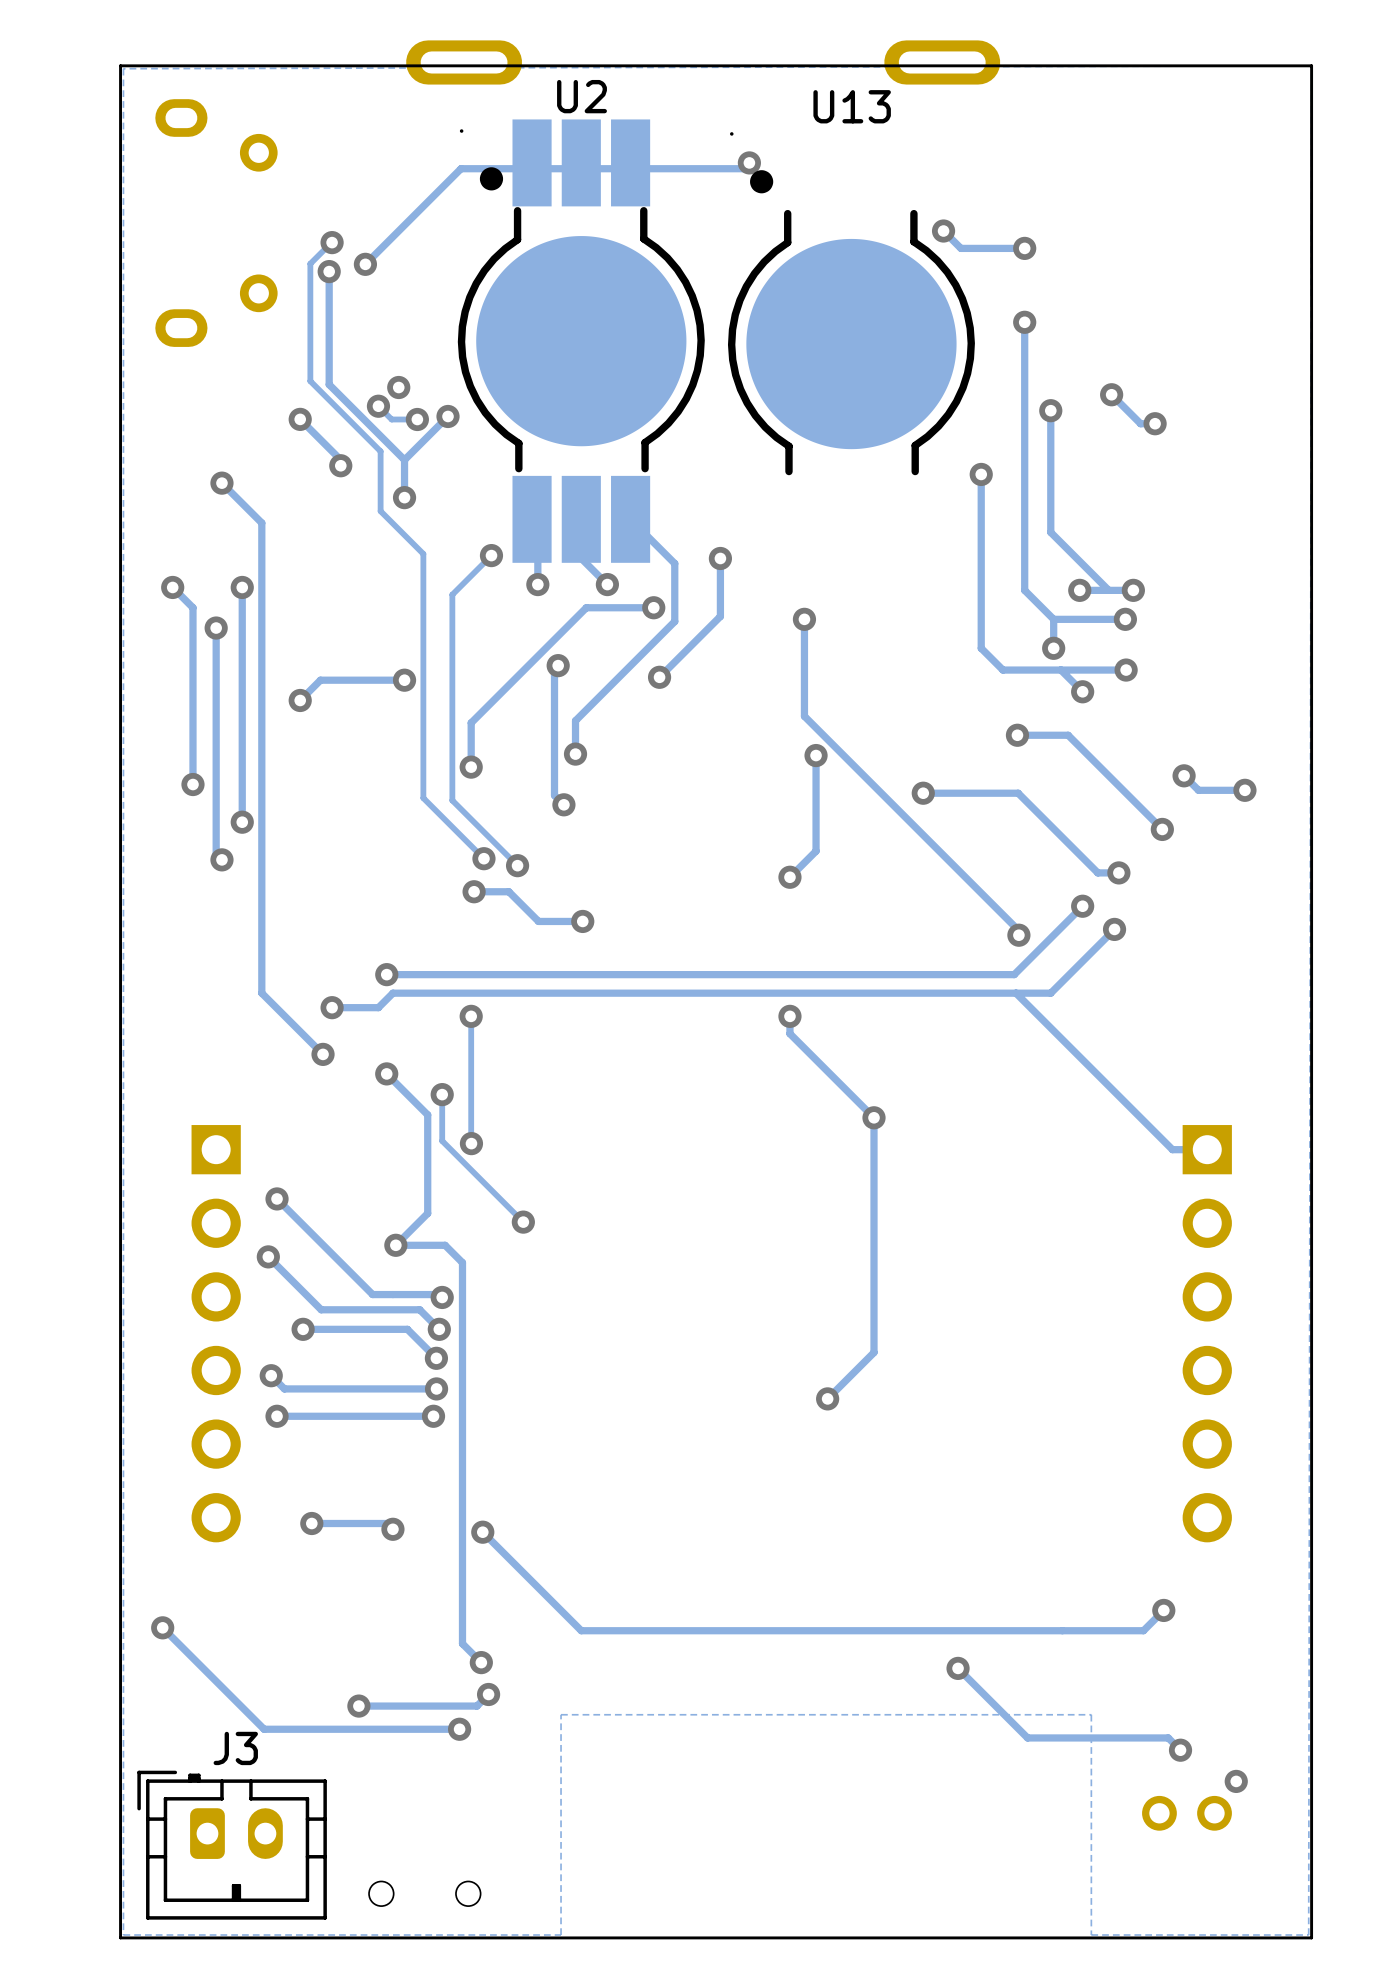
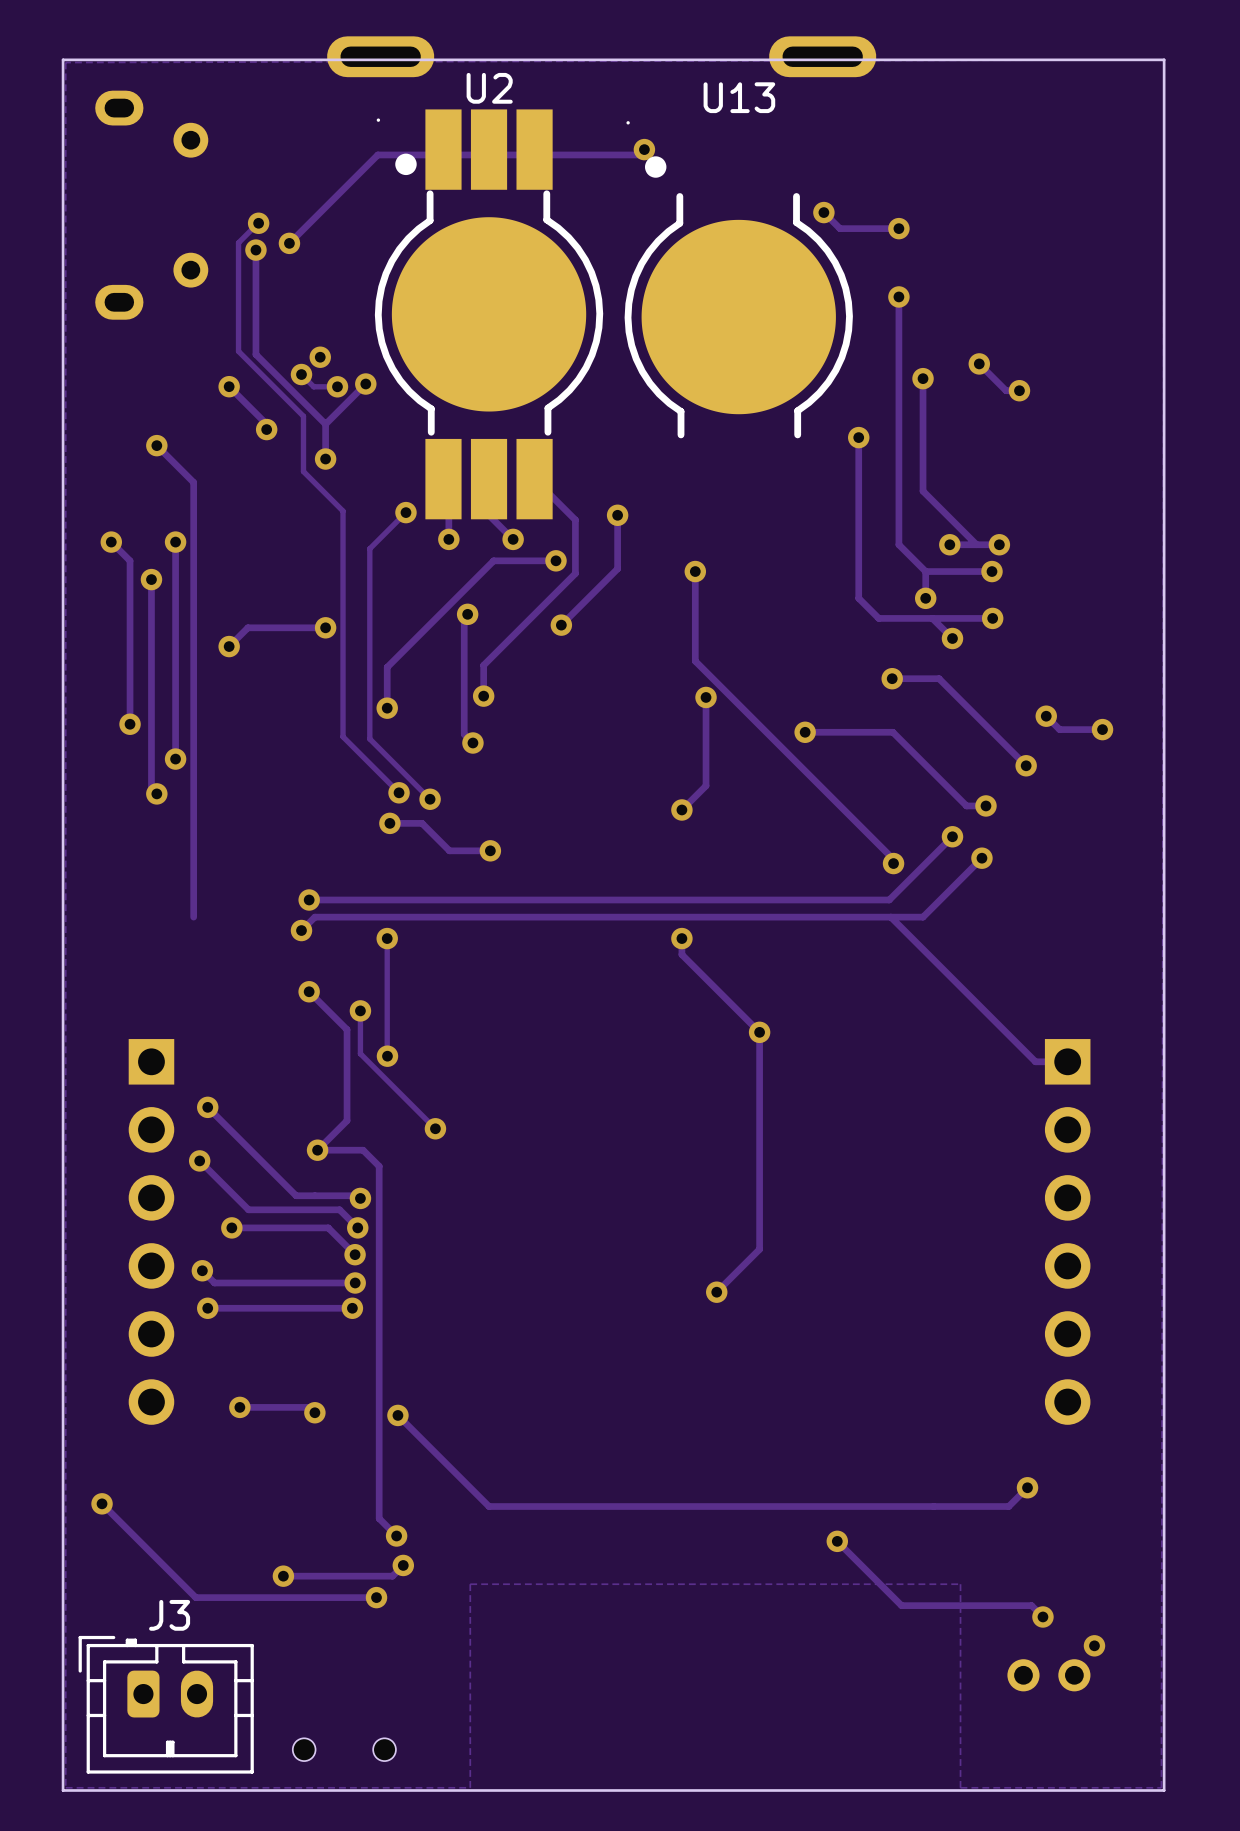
track: (261, 993) (323, 1054) -> none
via: (332, 1007) -> none
track: (378, 1007) (332, 1007) -> none
via: none -> (301, 930)
via: (323, 1054) -> none

